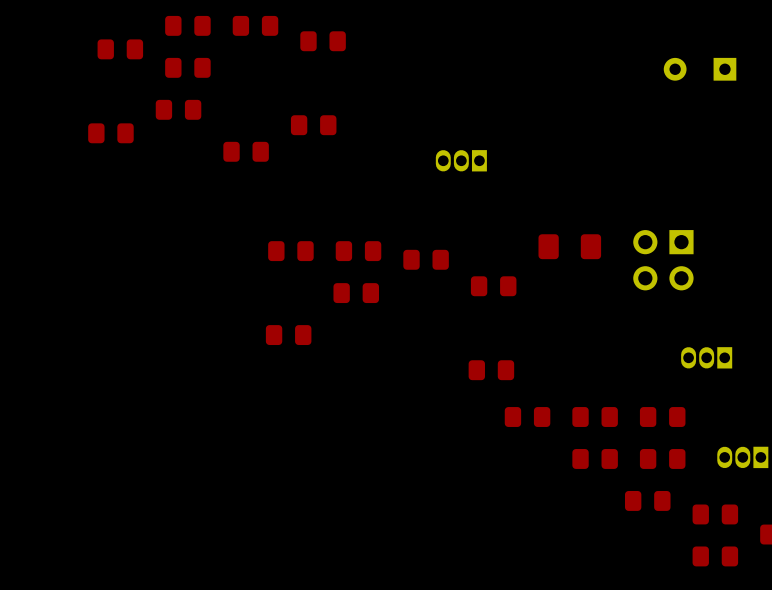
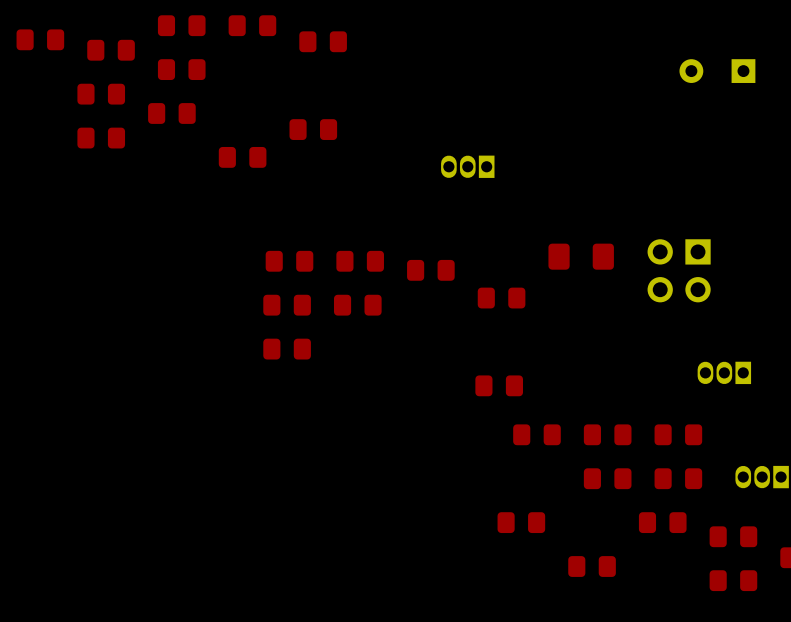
part: none -> (40, 39)
part: none -> (101, 94)
part: none -> (287, 305)
part: none -> (521, 522)
part: none -> (592, 566)

